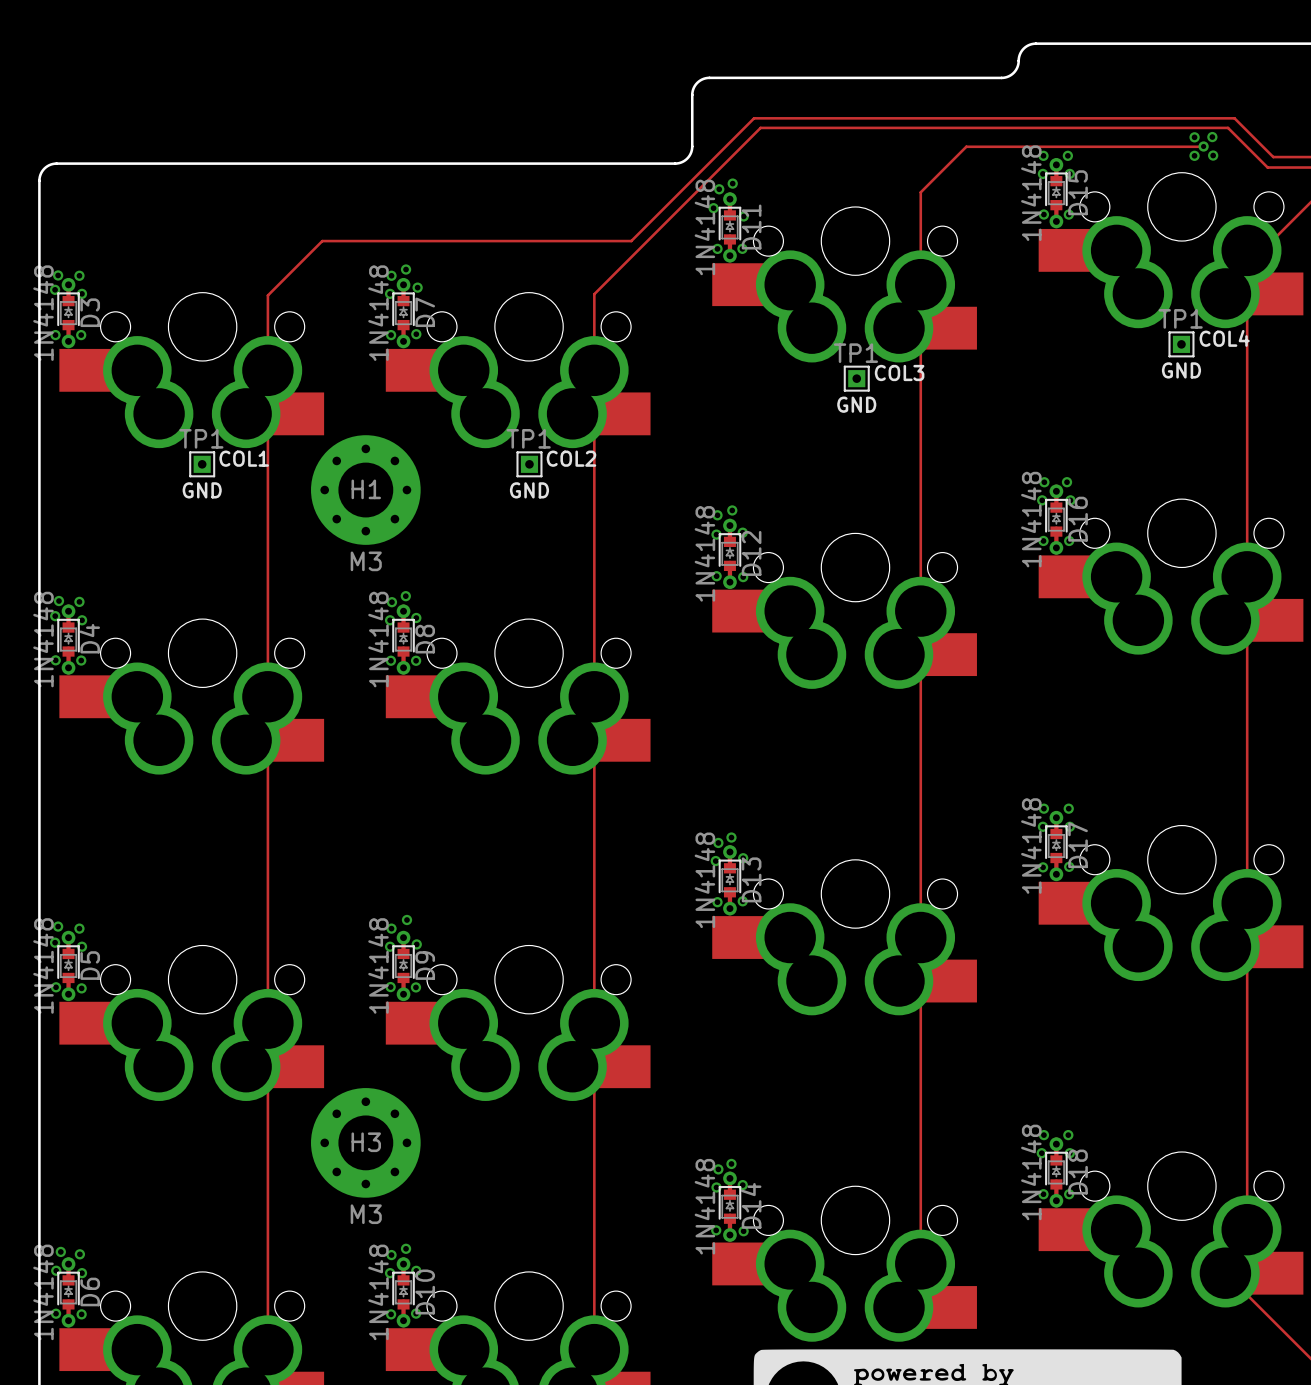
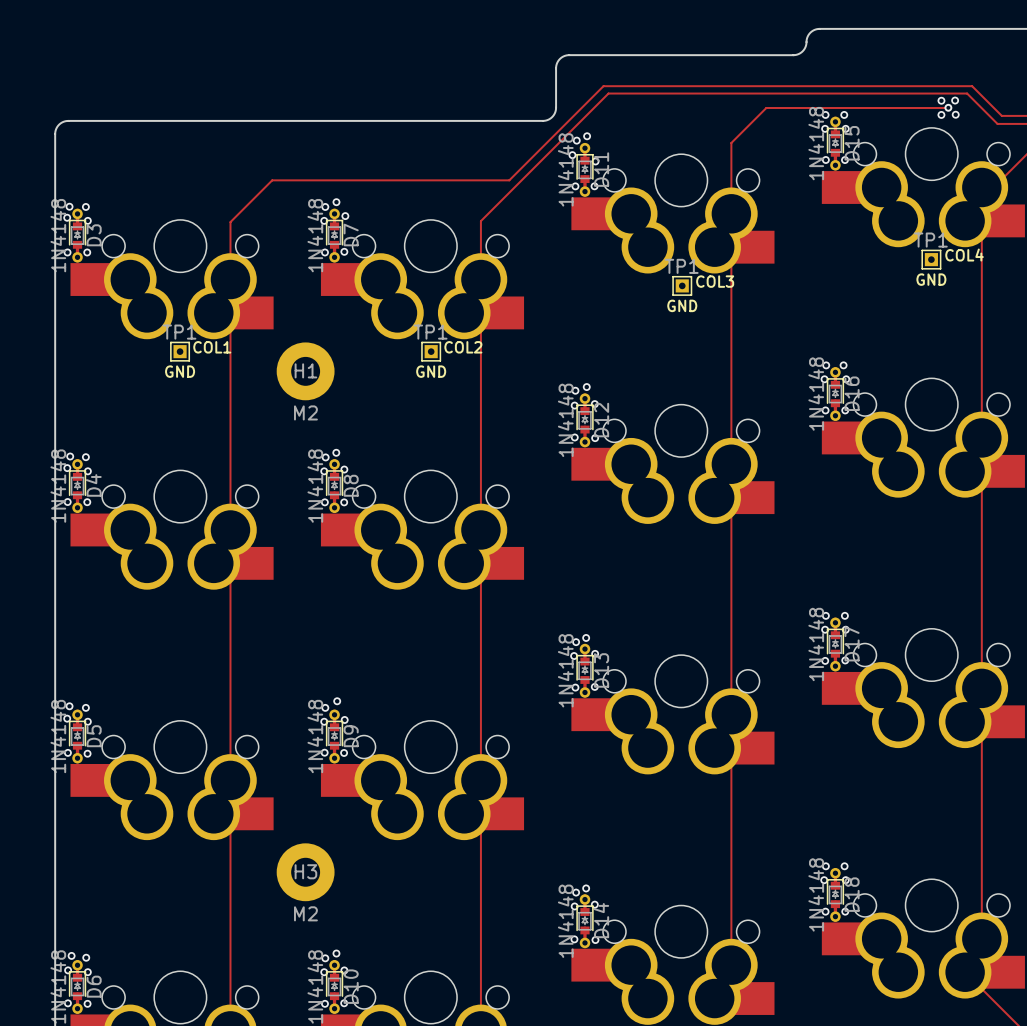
H1 footprint: [311, 435, 421, 545] -> [276, 342, 335, 401]
H1 value: M3 (366, 561) -> M2 (305, 412)
H3 footprint: [311, 1088, 421, 1198] -> [276, 843, 335, 902]
H3 value: M3 (366, 1214) -> M2 (305, 913)

